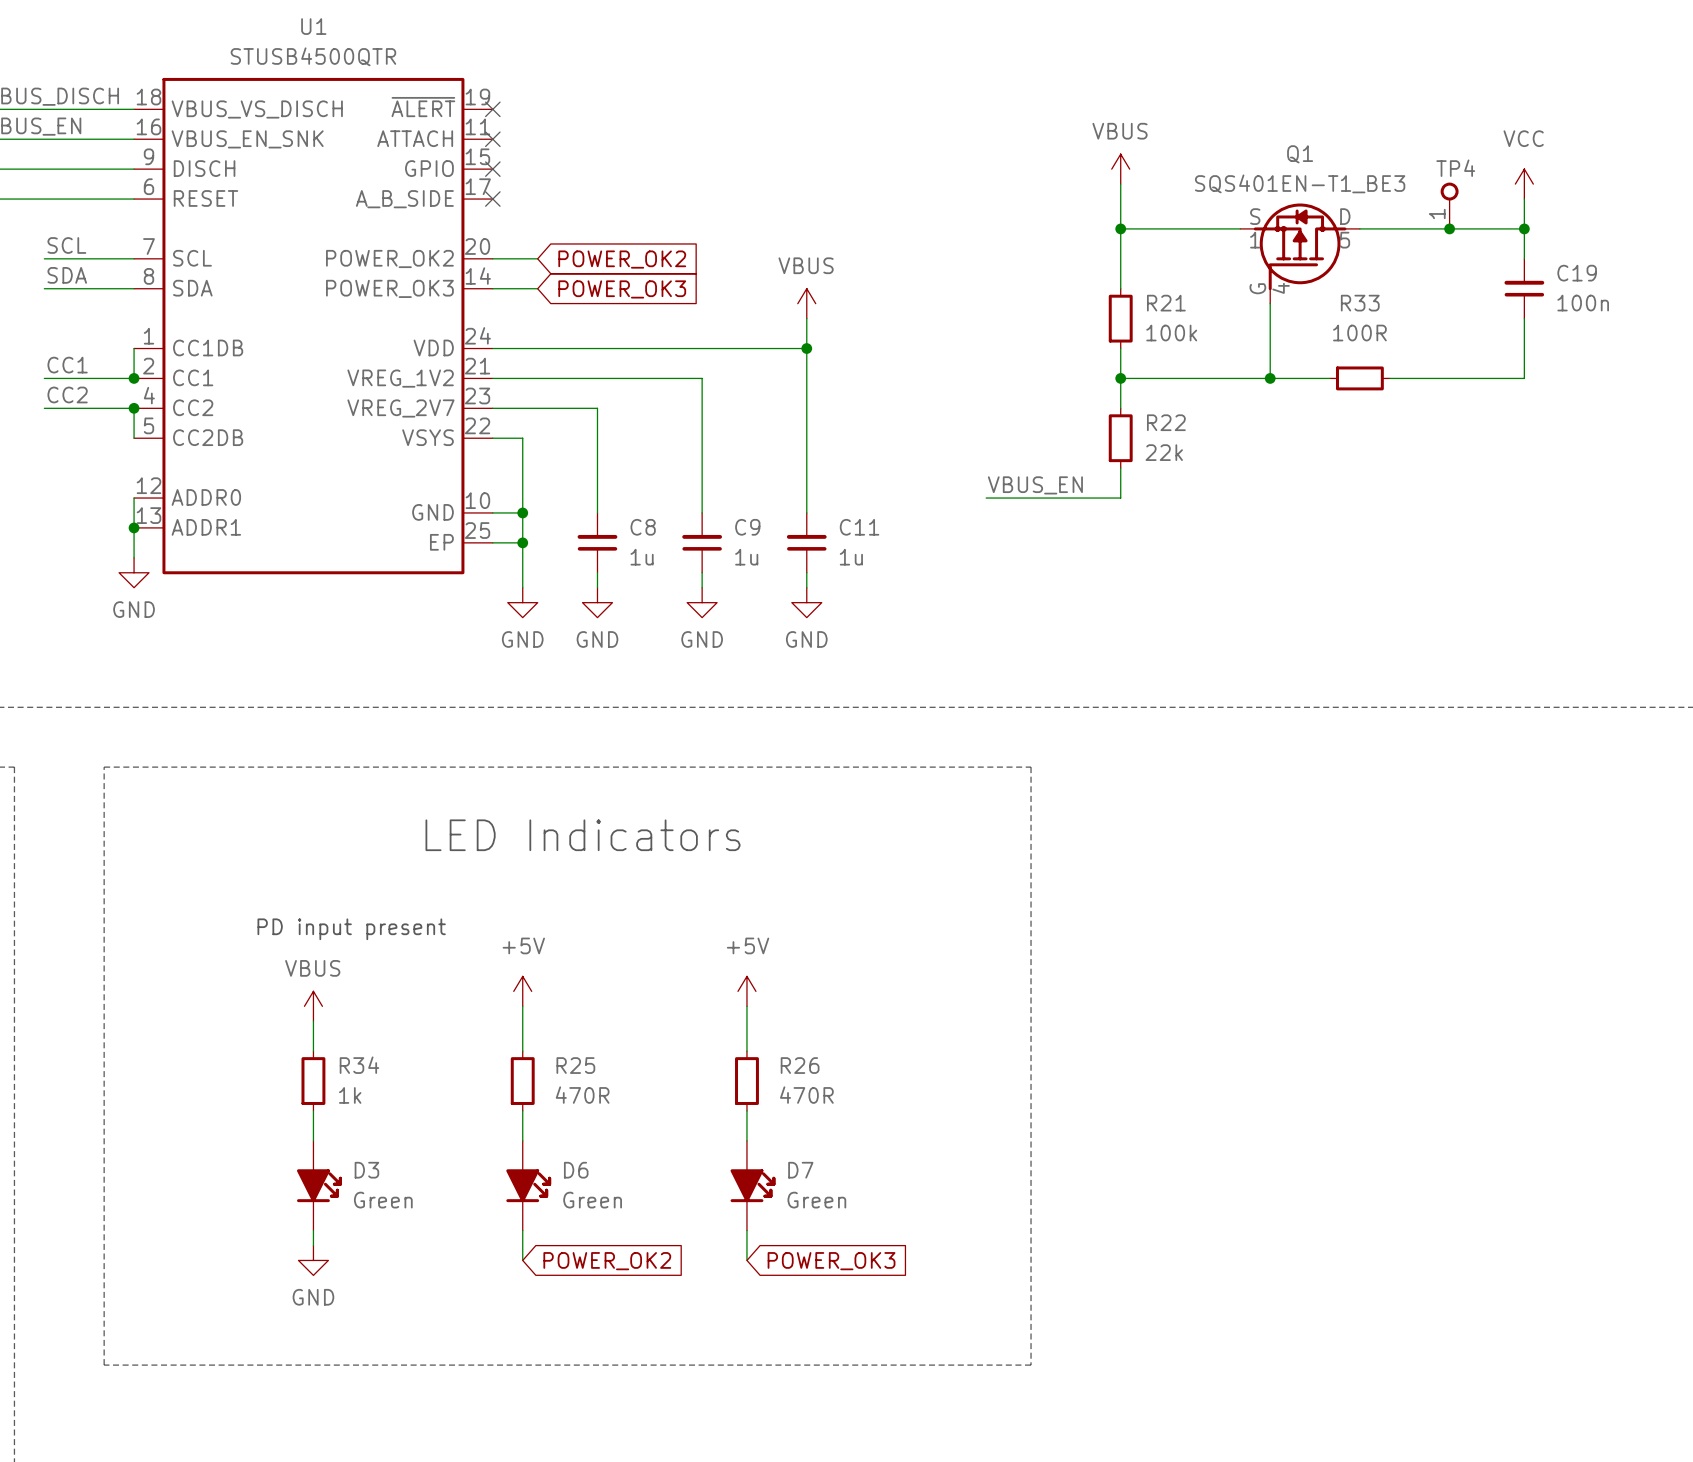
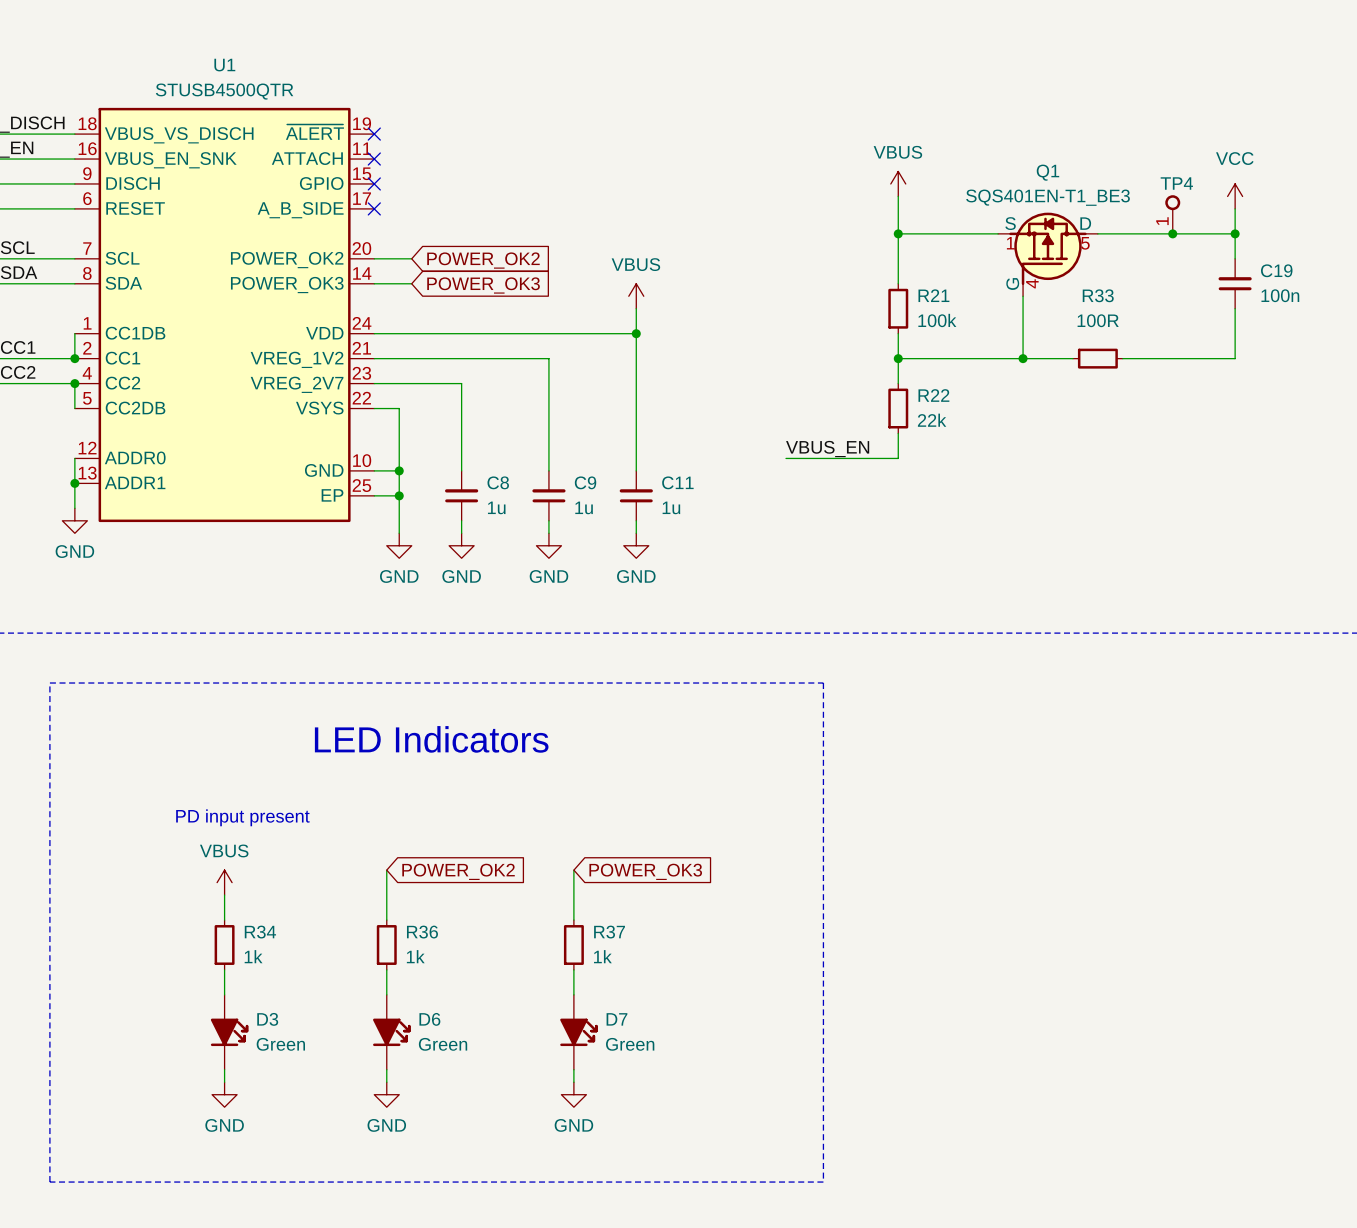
wire: none -> (386, 870) (386, 920)
power symbol: +5V (522, 991) -> none
wire: none -> (573, 870) (573, 920)
power symbol: +5V (746, 991) -> none
wire: (522, 1006) (522, 1051) -> none
wire: (746, 1006) (746, 1051) -> none
R36: none -> (386, 945)
R25: (522, 1081) -> none
R37: none -> (573, 945)
R26: (746, 1081) -> none
wire: (522, 1110) (522, 1140) -> (386, 969) (386, 994)
wire: (746, 1110) (746, 1140) -> (573, 969) (573, 994)
D6 position: (528, 1185) -> (391, 1032)
D7 position: (752, 1185) -> (578, 1032)
wire: none -> (386, 1069) (386, 1082)
wire: (522, 1230) (522, 1260) -> none
wire: none -> (573, 1069) (573, 1082)
wire: (746, 1230) (746, 1260) -> none
power symbol: none -> GND (386, 1094)
power symbol: none -> GND (573, 1094)
global label position: POWER_OK2 (607, 1261) -> POWER_OK2 (458, 871)
global label position: POWER_OK3 (831, 1261) -> POWER_OK3 (645, 871)

